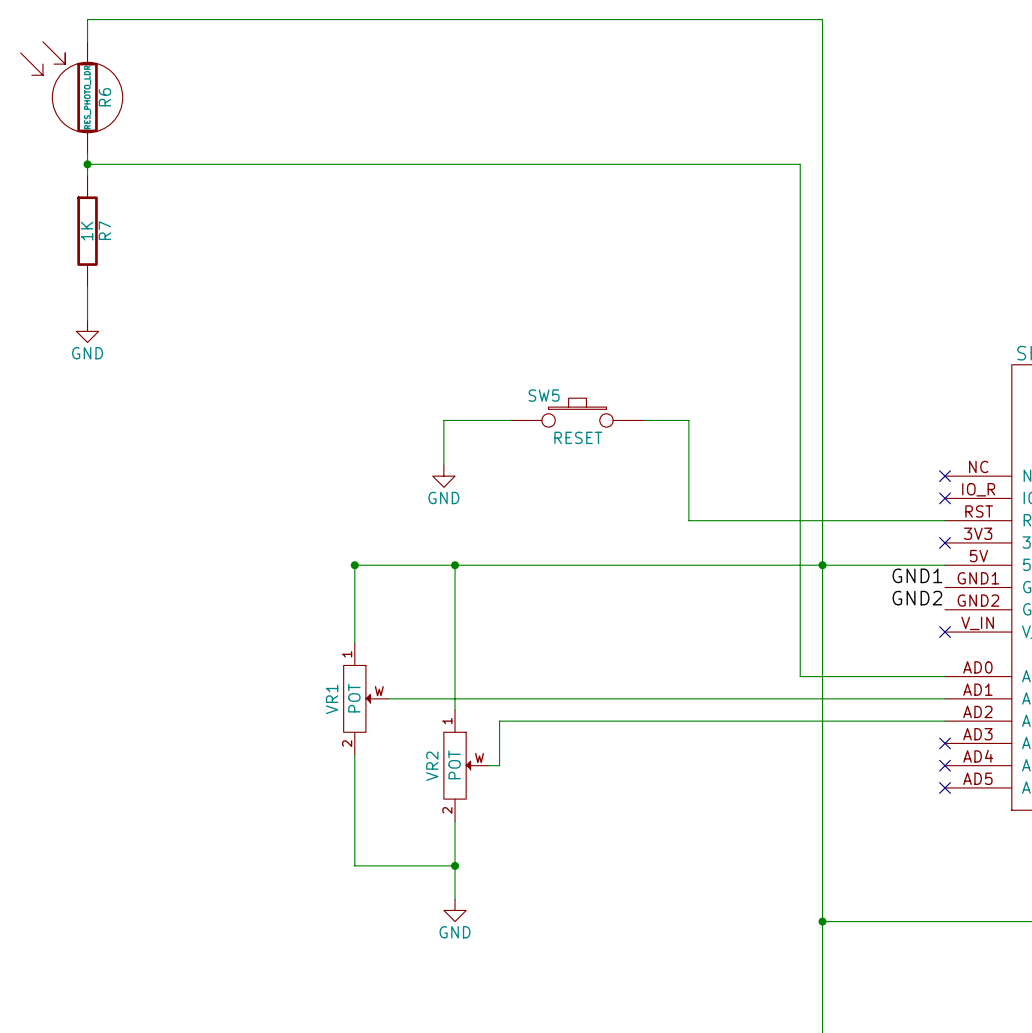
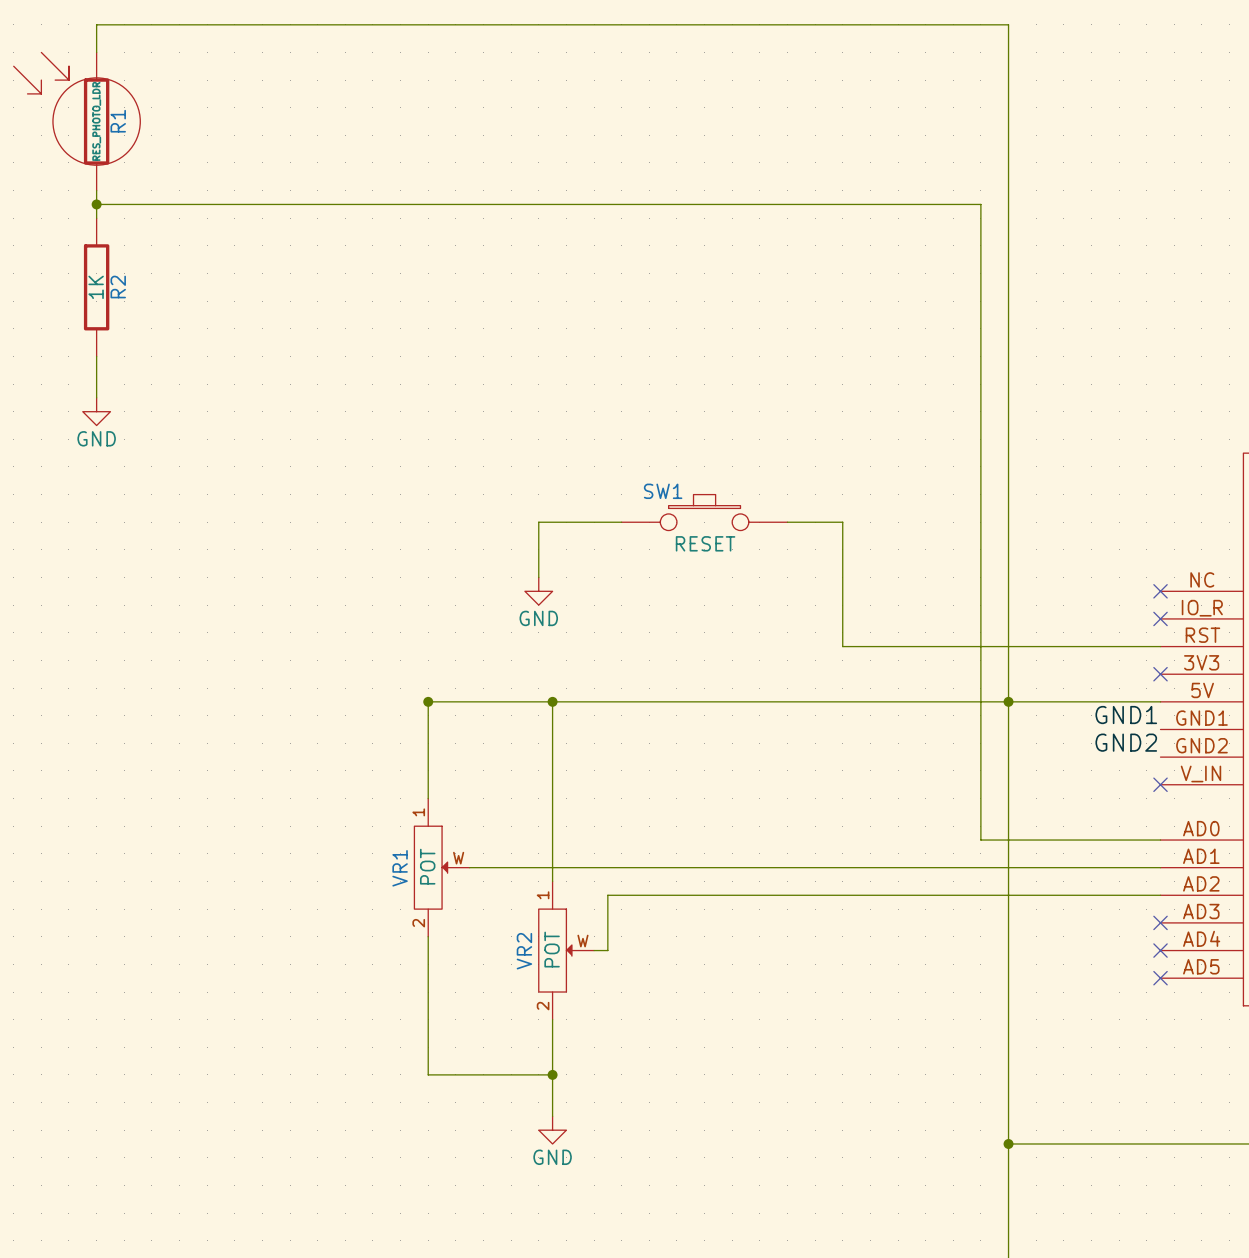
R6 name: R6 (104, 97) -> R1 (118, 121)
R7 name: R7 (104, 230) -> R2 (118, 287)
SW5 name: SW5 (544, 395) -> SW1 (663, 491)

